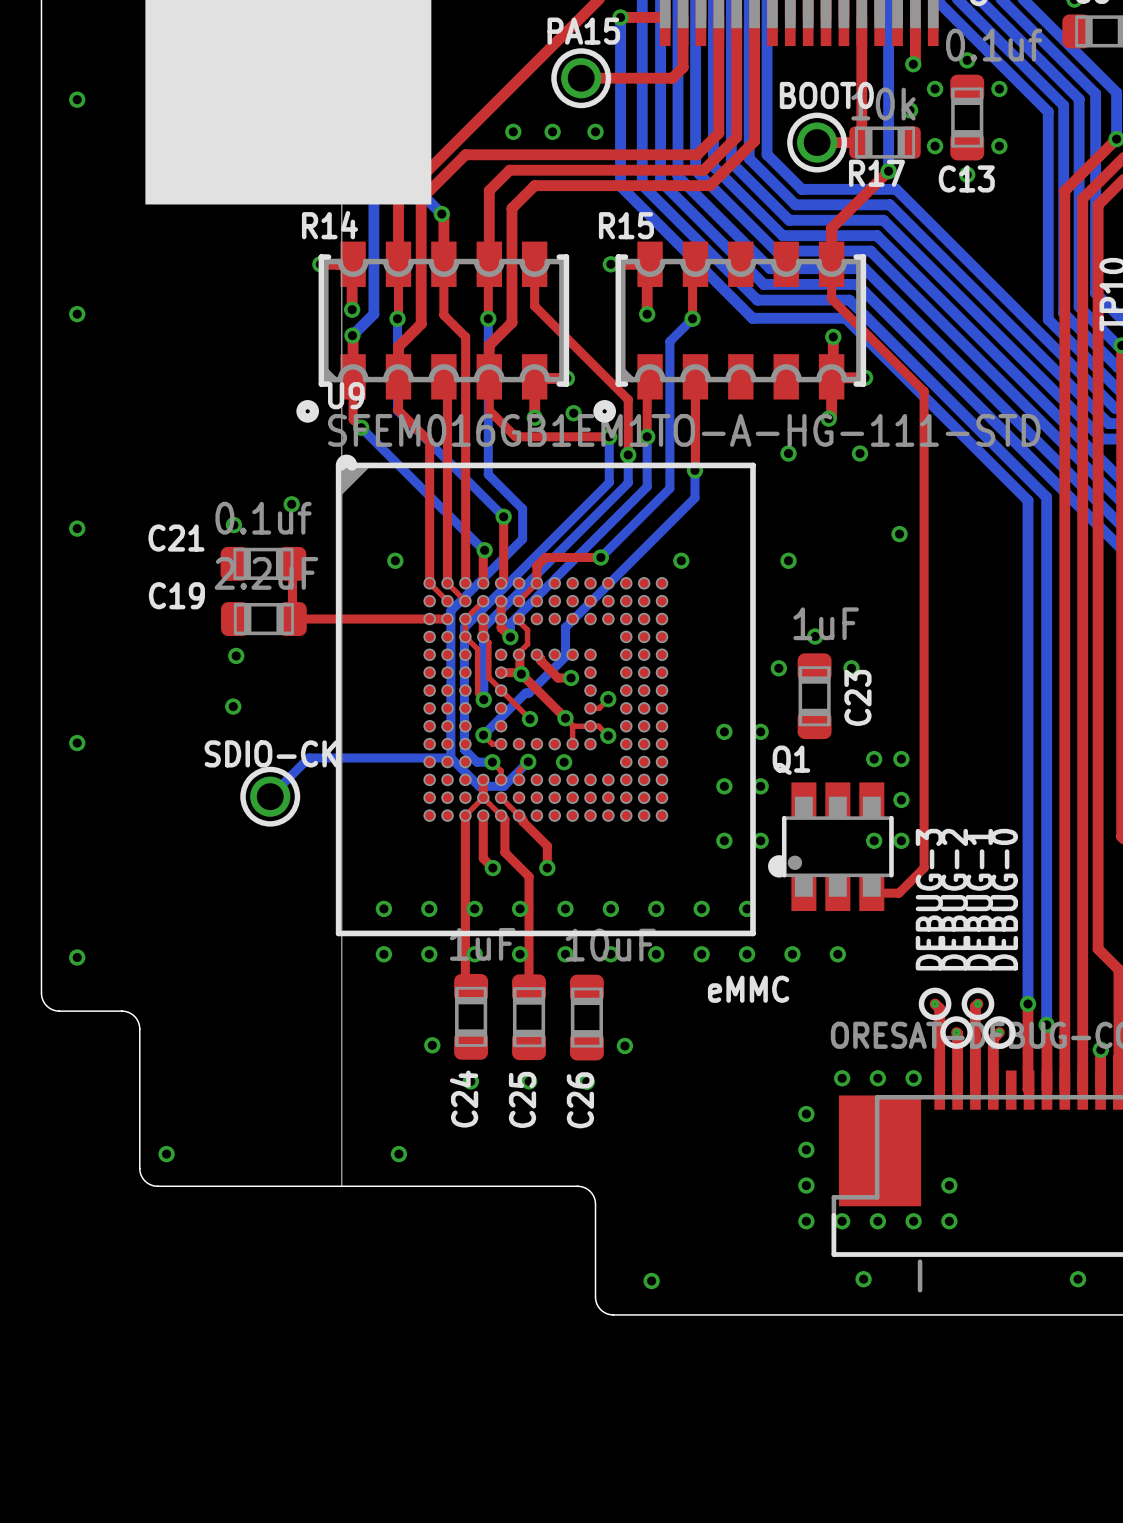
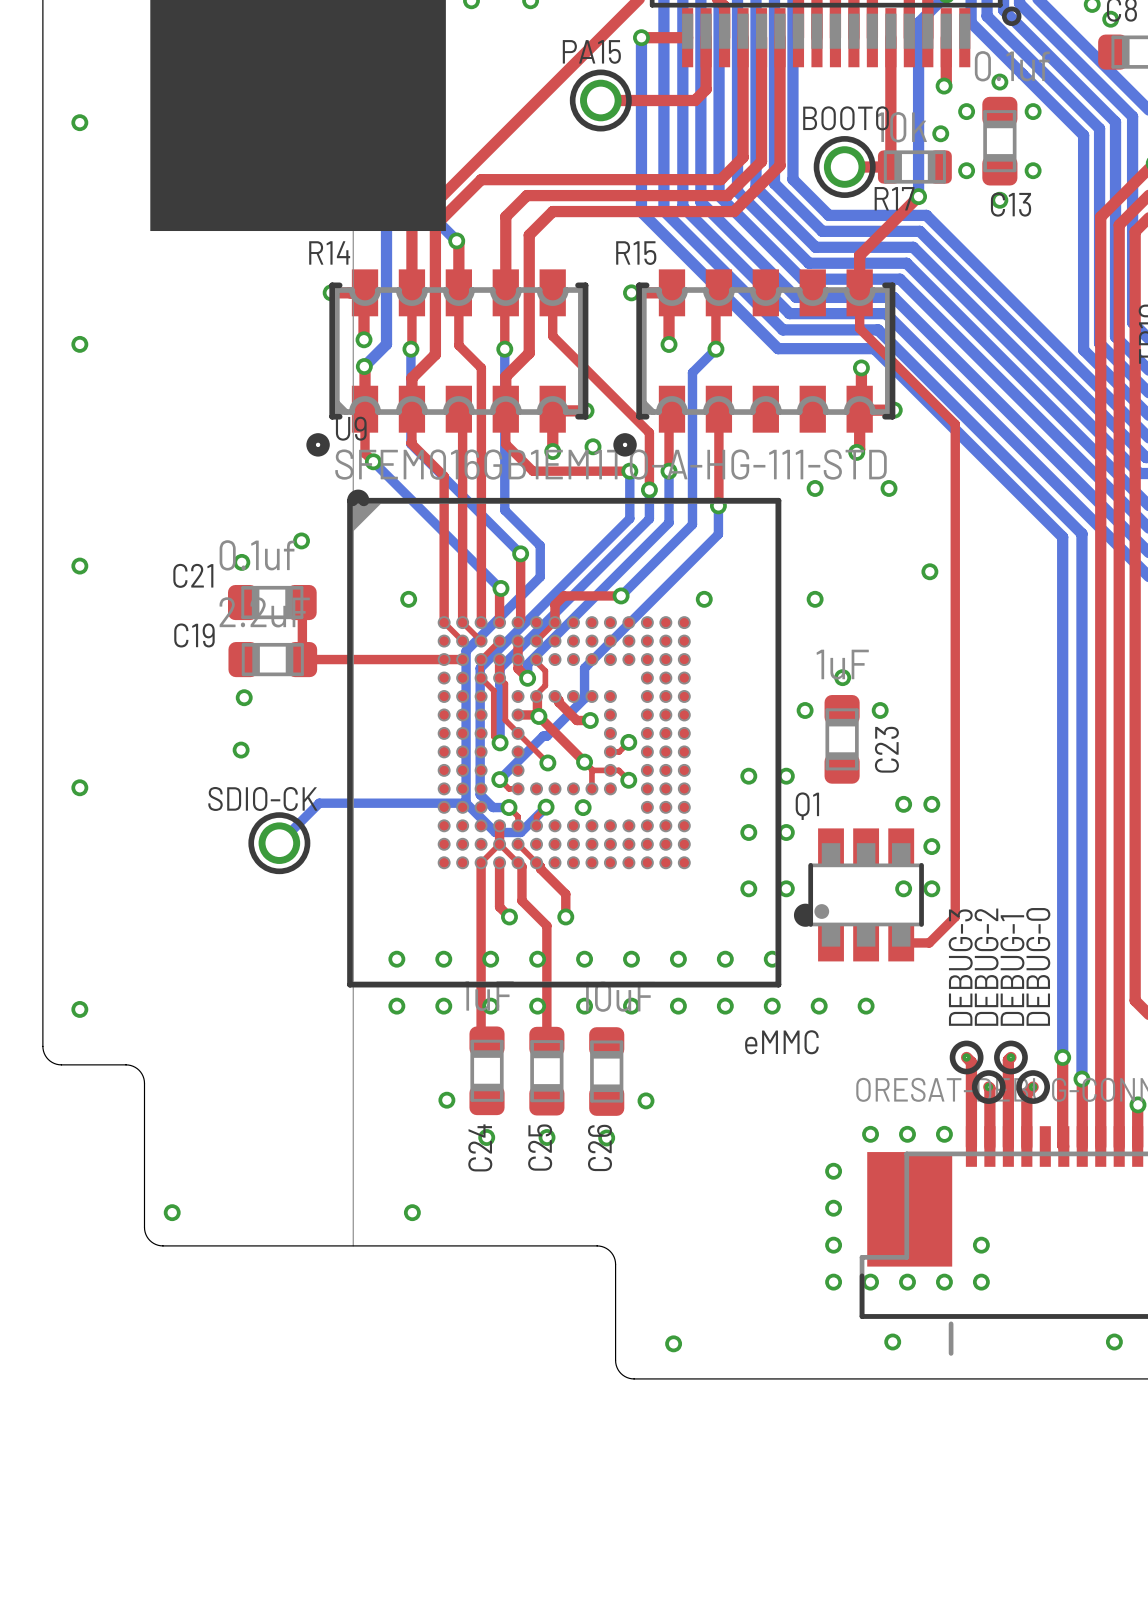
via: (513, 131) -> none
via: (552, 131) -> none
via: (595, 131) -> none

